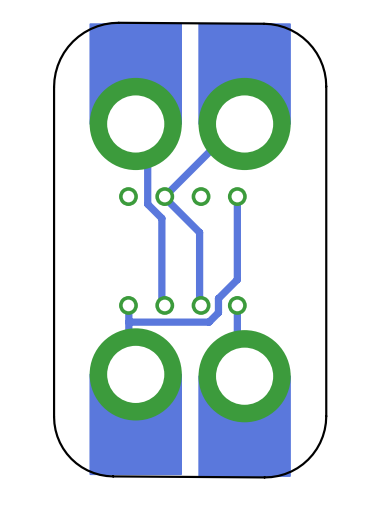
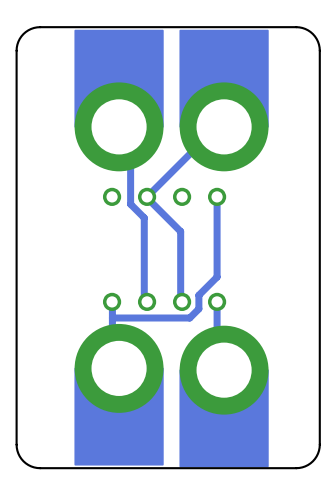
board edge: (118, 22) (277, 25) (291, 30) (302, 37) (312, 47) (322, 65) (326, 86) (325, 423) (322, 436) (312, 454) (297, 468) (284, 474) (264, 477) (106, 475) (87, 470) (76, 463) (63, 448) (57, 436) (54, 416) (54, 79) (60, 59) (68, 46) (78, 36) (97, 26) (118, 22) -> (296, 27) (305, 28) (312, 34) (318, 41) (319, 50) (319, 444) (316, 456) (308, 465) (296, 468) (40, 468) (28, 465) (19, 456) (16, 444) (16, 50) (19, 38) (28, 30) (40, 27) (296, 27)

